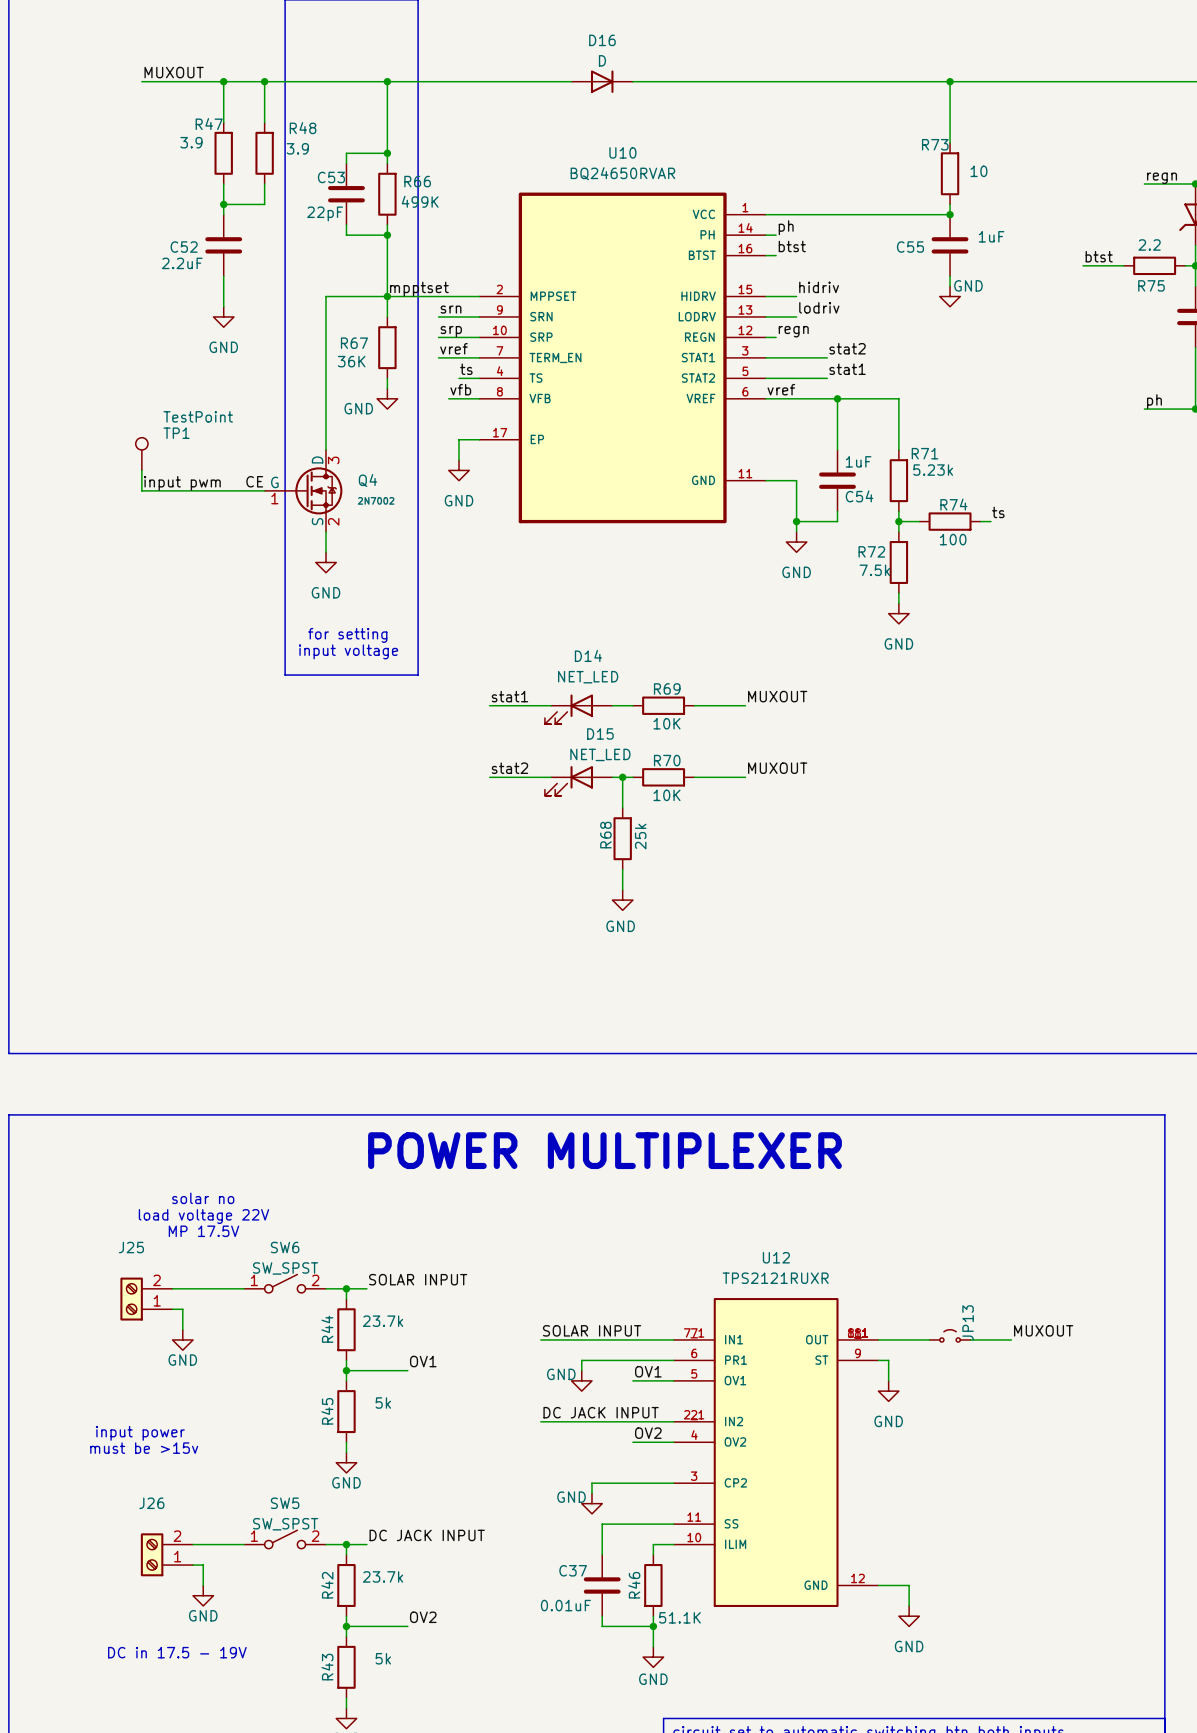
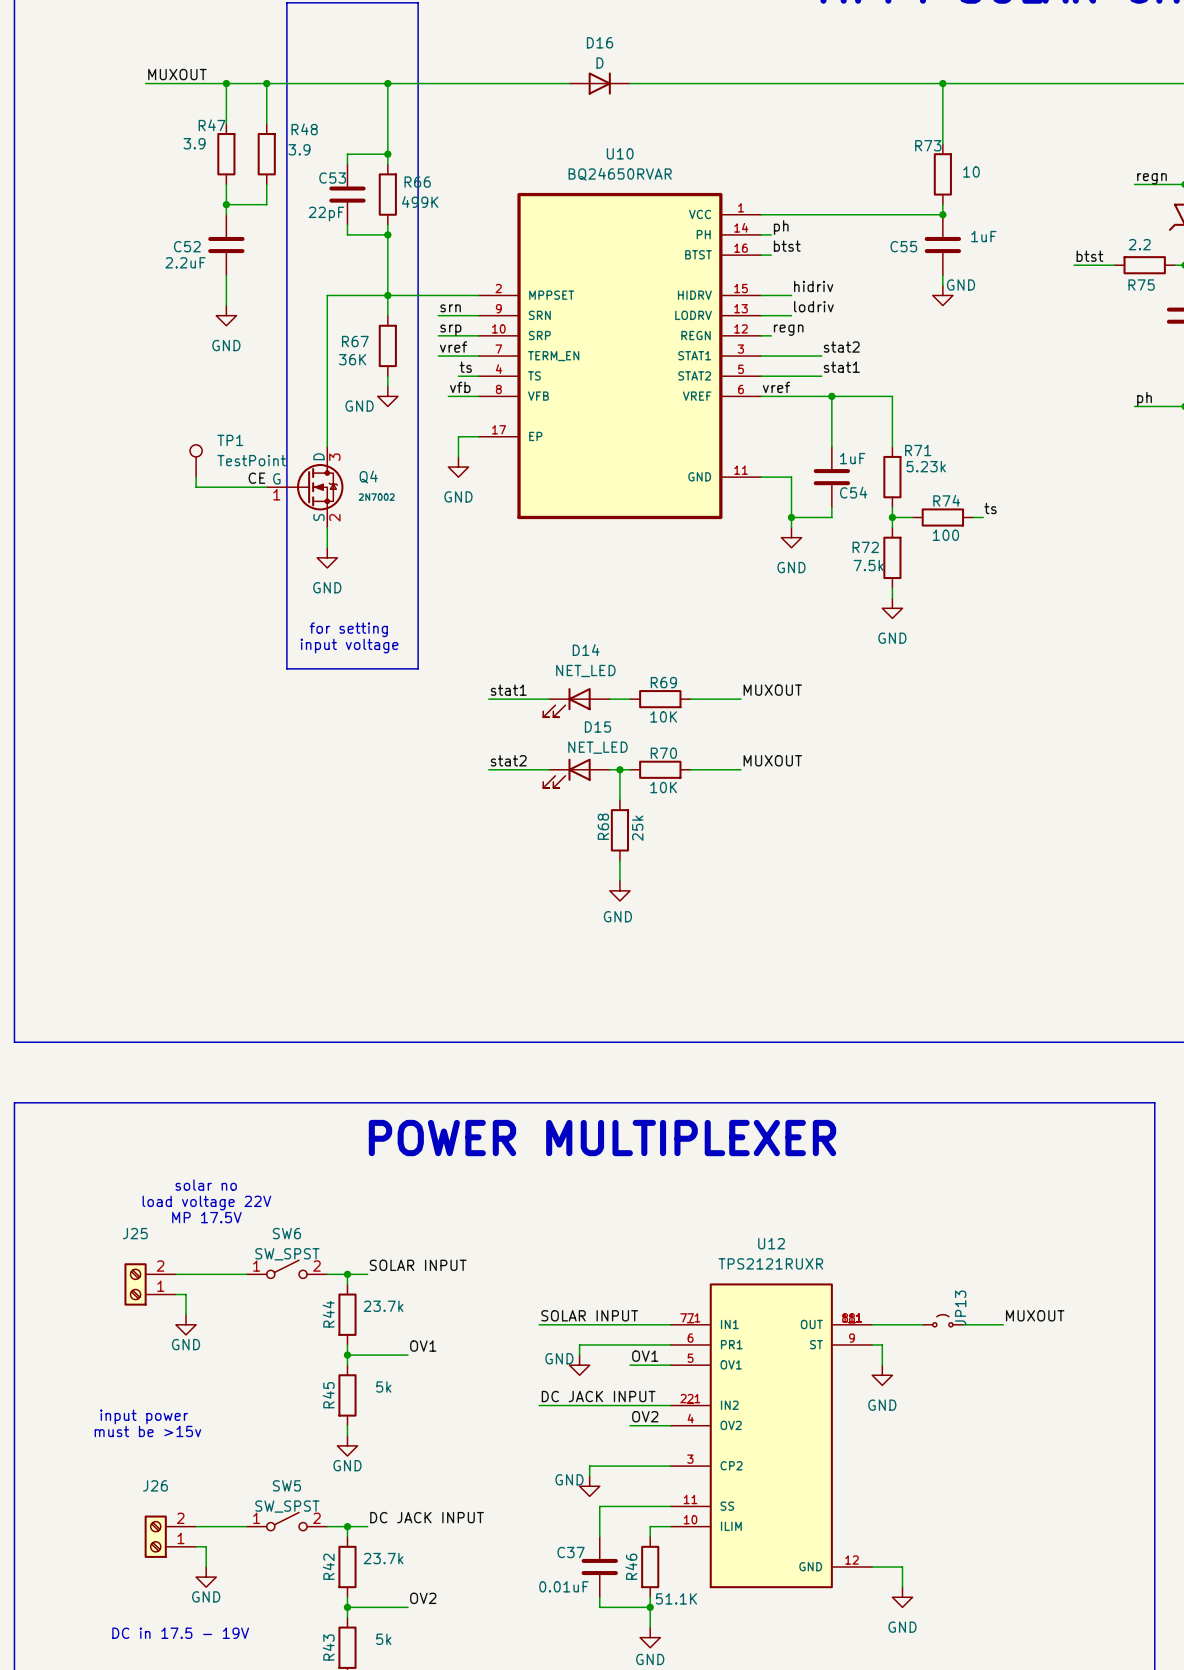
label: mpptset (419, 289) -> none
TP1 value position: TestPoint (198, 416) -> TestPoint (251, 460)
TP1 position: (141, 454) -> (196, 460)
wire: (141, 470) (141, 490) (193, 490) -> (196, 477) (196, 487)
label: input pwm (182, 483) -> none

